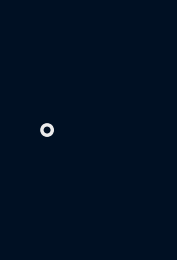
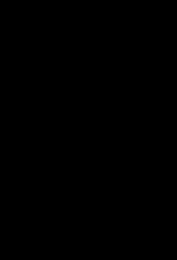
via: (47, 130) -> none

